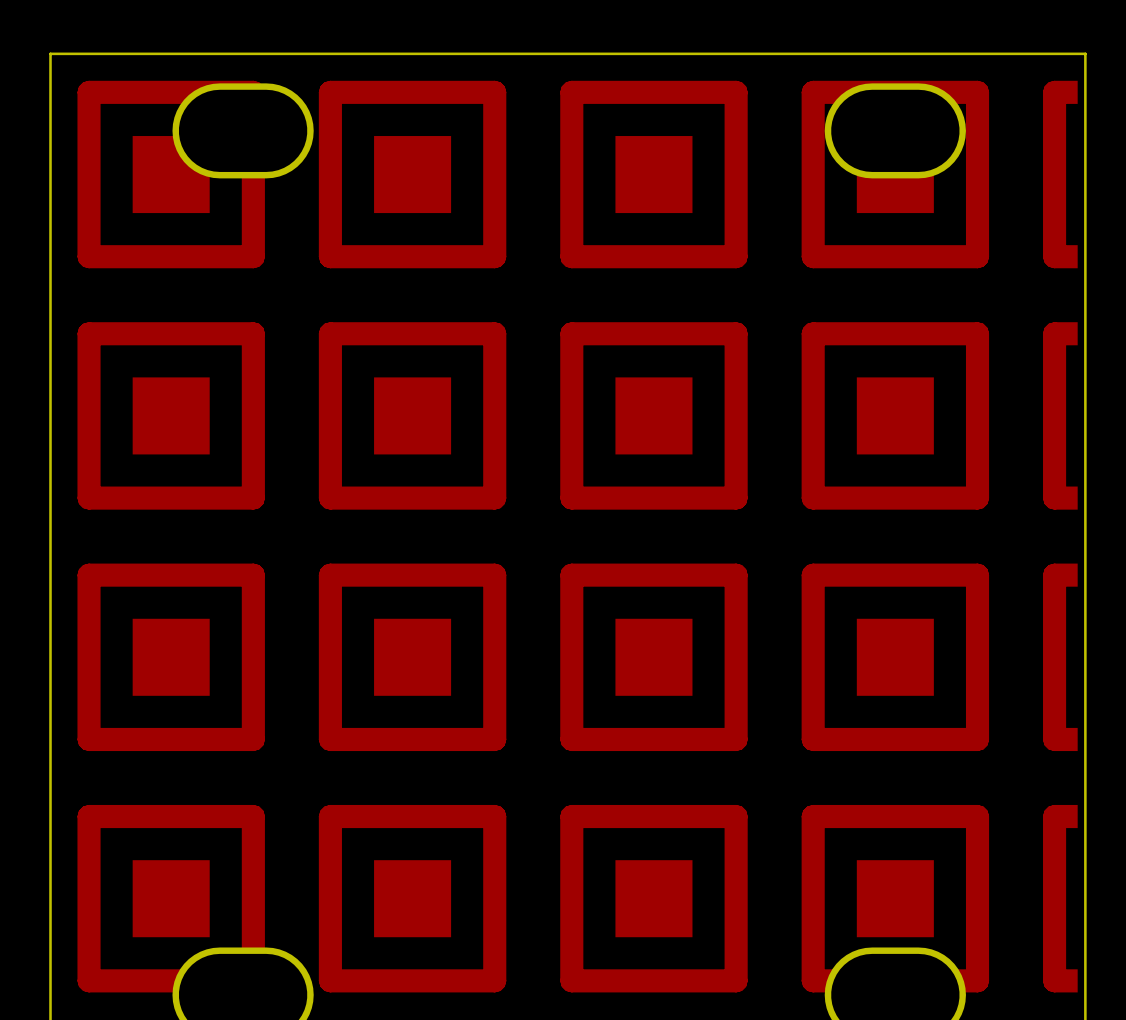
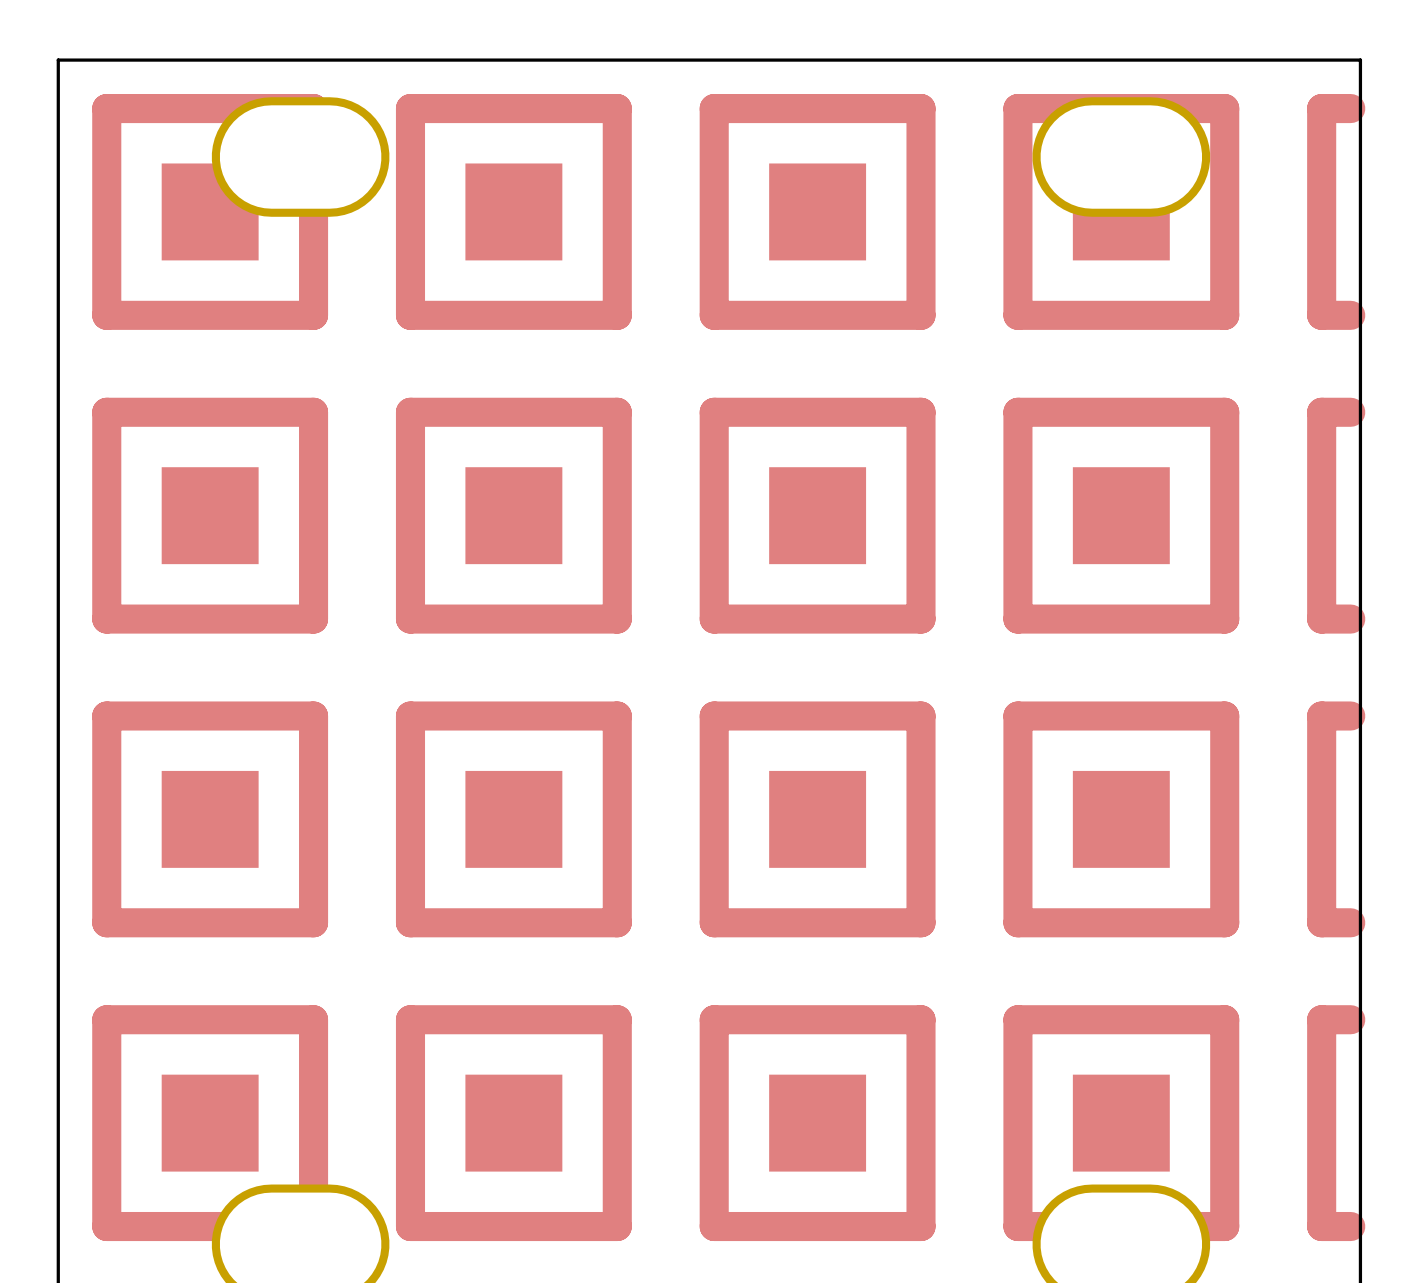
drawing: [77, 80, 265, 269] -> none
drawing: [318, 80, 507, 269] -> none
drawing: [560, 80, 748, 269] -> none
drawing: [801, 80, 990, 269] -> none
drawing: [1043, 80, 1078, 269] -> none
track: none -> (106, 108) (313, 108) (313, 315) (106, 315) (106, 108)
track: none -> (410, 108) (617, 108) (617, 315) (410, 315) (410, 108)
track: none -> (714, 108) (921, 108) (921, 315) (714, 315) (714, 108)
track: none -> (1017, 108) (1224, 108) (1224, 315) (1017, 315) (1017, 108)
track: none -> (1350, 108) (1321, 108) (1321, 315) (1350, 315)
drawing: [77, 322, 265, 510] -> none
drawing: [318, 322, 507, 510] -> none
drawing: [560, 322, 748, 510] -> none
drawing: [801, 322, 990, 510] -> none
drawing: [1043, 322, 1078, 510] -> none
track: none -> (106, 412) (106, 619) (313, 619) (313, 412) (106, 412)
track: none -> (410, 412) (410, 619) (617, 619) (617, 412) (410, 412)
track: none -> (714, 412) (714, 619) (921, 619) (921, 412) (714, 412)
track: none -> (1017, 412) (1017, 619) (1224, 619) (1224, 412) (1017, 412)
track: none -> (1350, 412) (1321, 412) (1321, 619) (1350, 619)
drawing: [77, 563, 265, 752] -> none
drawing: [318, 563, 507, 752] -> none
drawing: [560, 563, 748, 752] -> none
drawing: [801, 563, 990, 752] -> none
drawing: [1043, 563, 1078, 752] -> none
track: none -> (106, 716) (106, 922) (313, 922) (313, 716) (106, 716)
track: none -> (410, 716) (410, 922) (617, 922) (617, 716) (410, 716)
track: none -> (714, 716) (714, 922) (921, 922) (921, 716) (714, 716)
track: none -> (1017, 716) (1017, 922) (1224, 922) (1224, 716) (1017, 716)
track: none -> (1350, 716) (1321, 716) (1321, 922) (1350, 922)
drawing: [77, 804, 265, 993] -> none
drawing: [318, 804, 507, 993] -> none
drawing: [560, 804, 748, 993] -> none
drawing: [801, 804, 990, 993] -> none
drawing: [1043, 804, 1078, 993] -> none
track: none -> (106, 1019) (106, 1226) (313, 1226) (313, 1019) (106, 1019)
track: none -> (410, 1019) (410, 1226) (617, 1226) (617, 1019) (410, 1019)
track: none -> (714, 1019) (714, 1226) (921, 1226) (921, 1019) (714, 1019)
track: none -> (1017, 1019) (1017, 1226) (1224, 1226) (1224, 1019) (1017, 1019)
track: none -> (1350, 1019) (1321, 1019) (1321, 1226) (1350, 1226)

